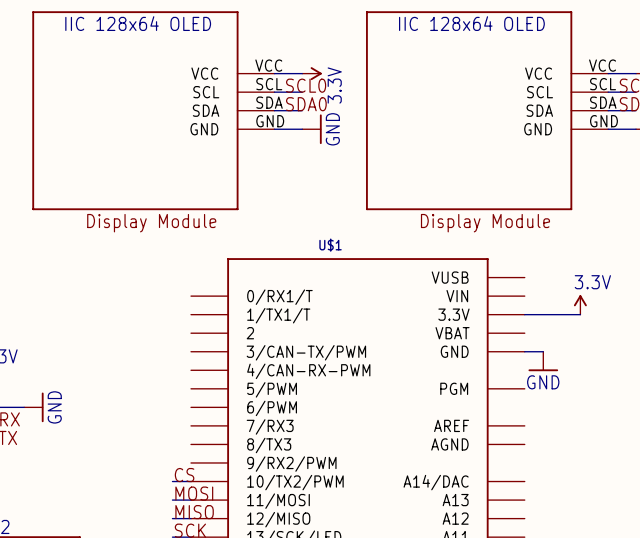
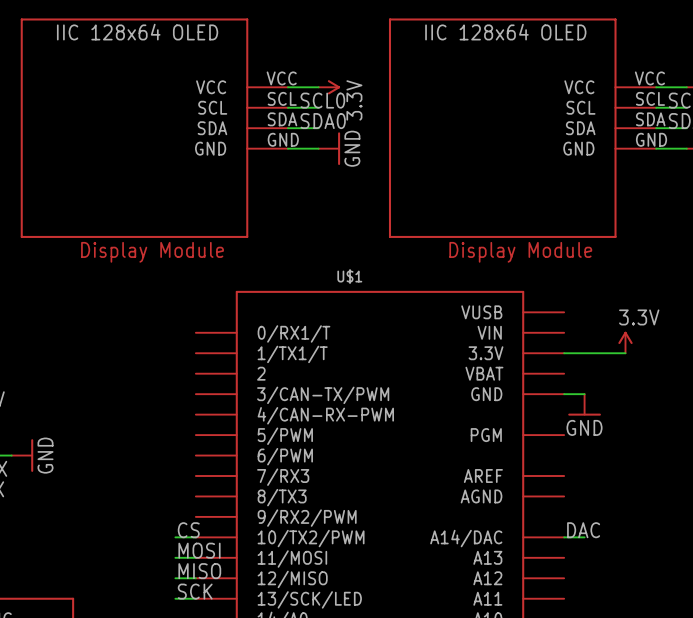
label: none -> DAC (583, 530)
wire: none -> (564, 537) (584, 537)

